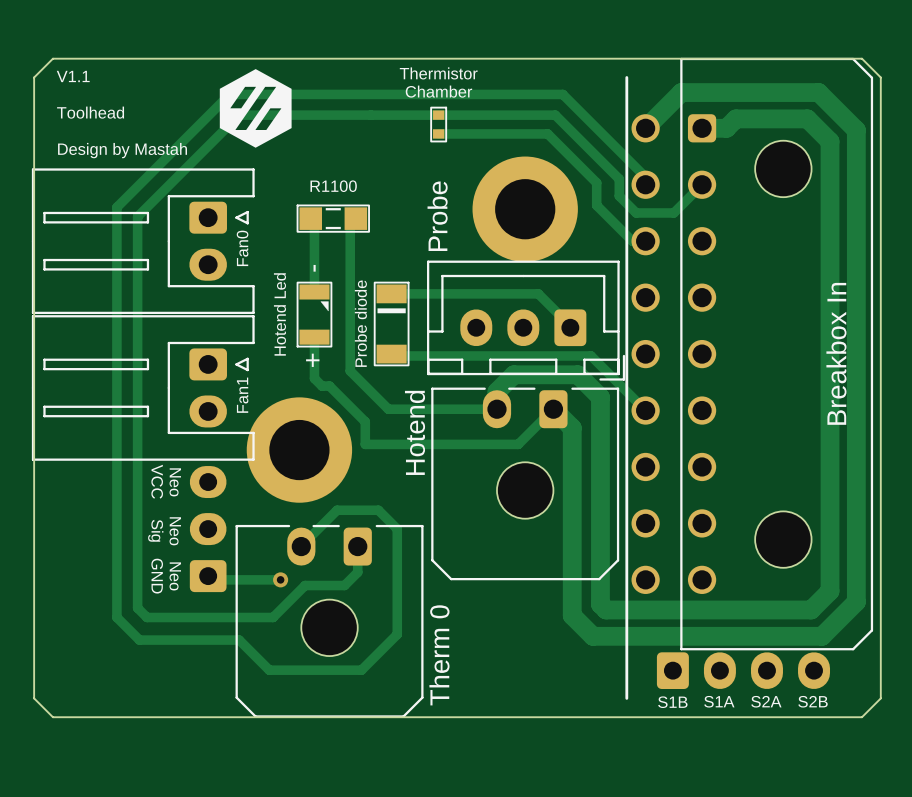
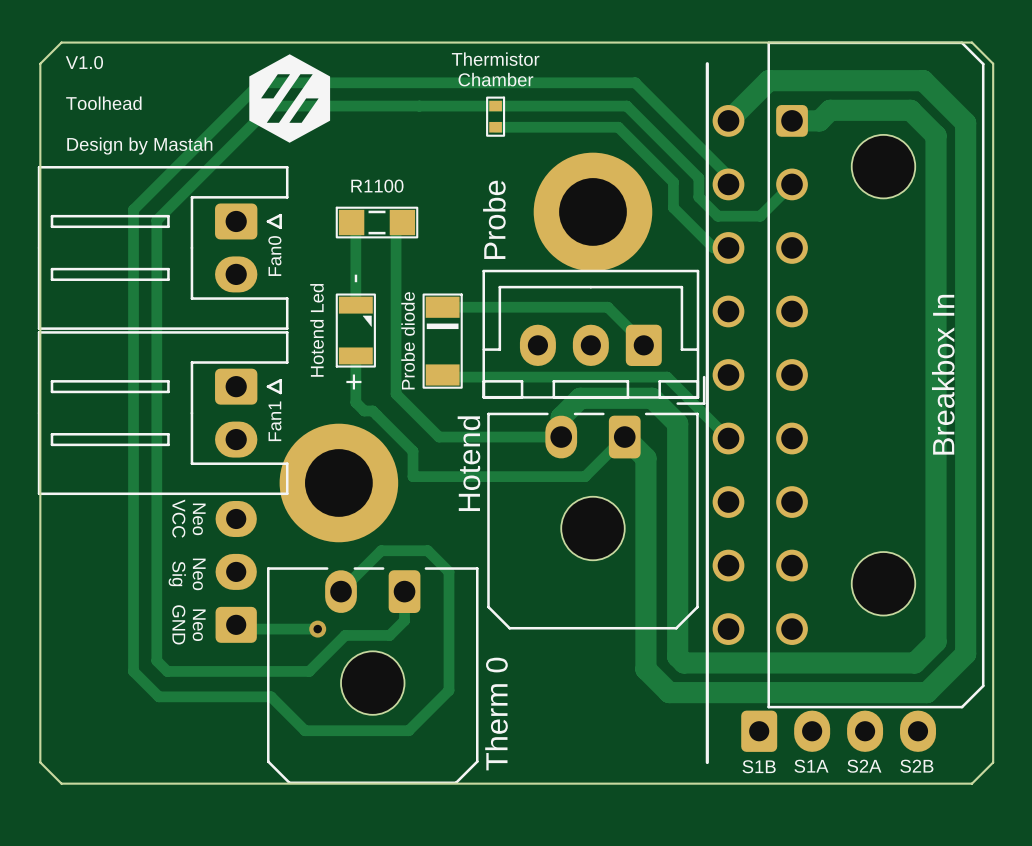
text: V1.1 (73, 76) -> V1.0 (84, 62)

